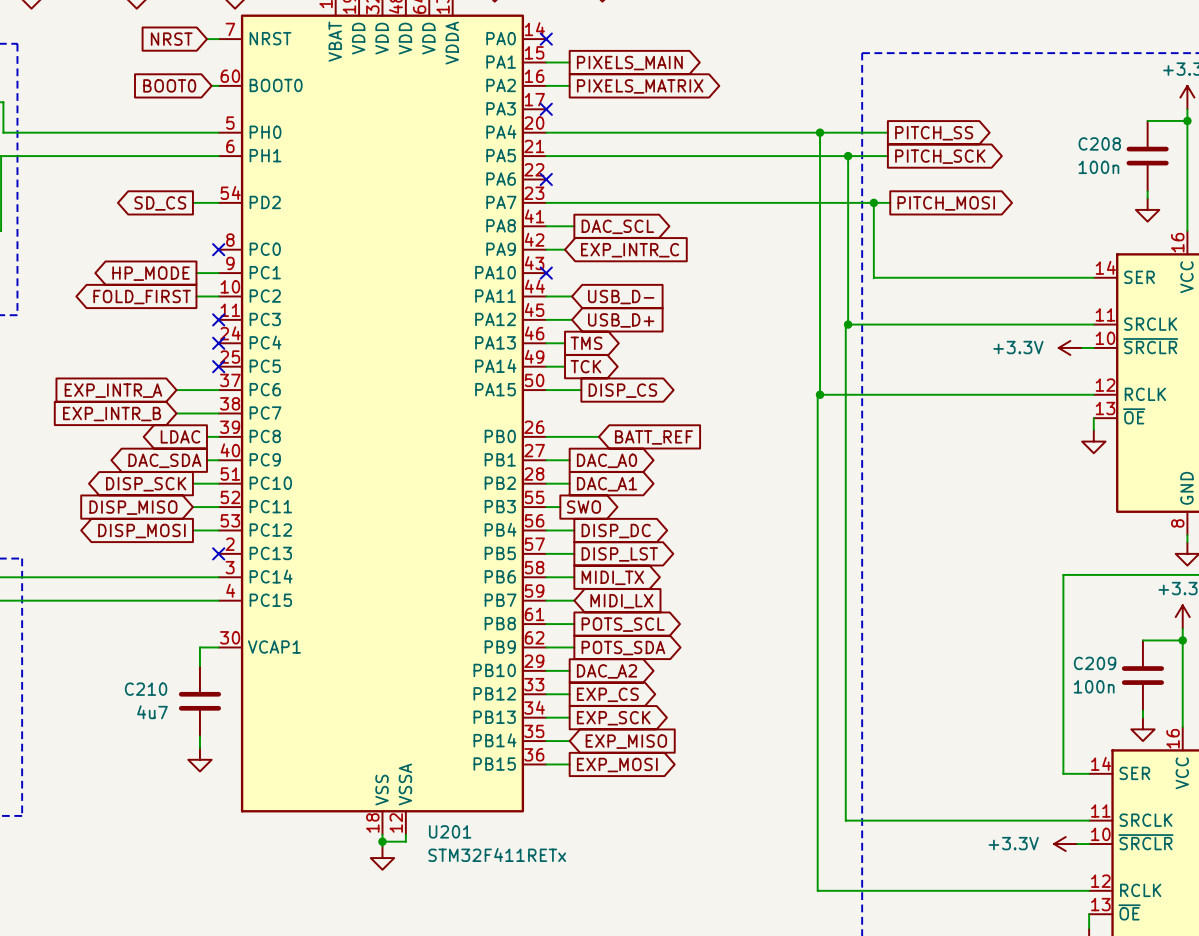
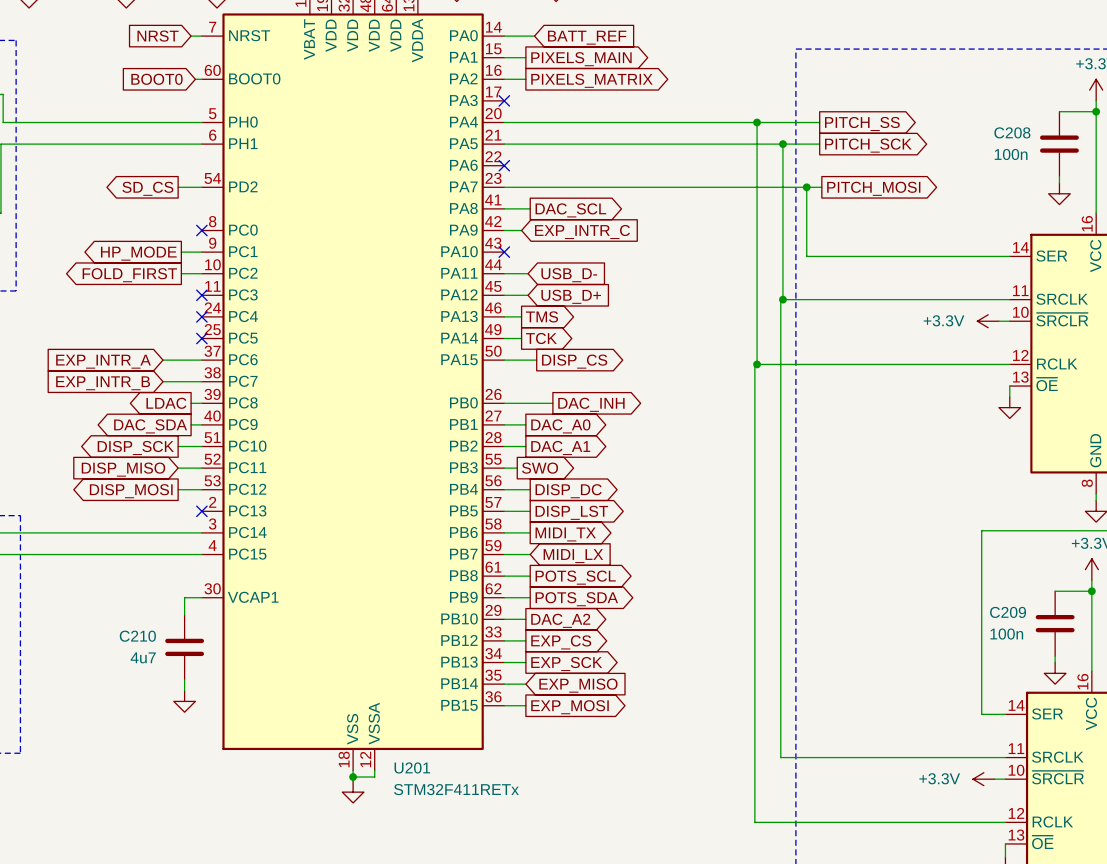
wire: none -> (504, 36) (534, 36)
no-connect mark: (546, 39) -> none
global label: none -> BATT_REF (587, 37)
global label shape: input (653, 437) -> output (591, 404)
global label: BATT_REF (653, 437) -> DAC_INH (591, 404)

